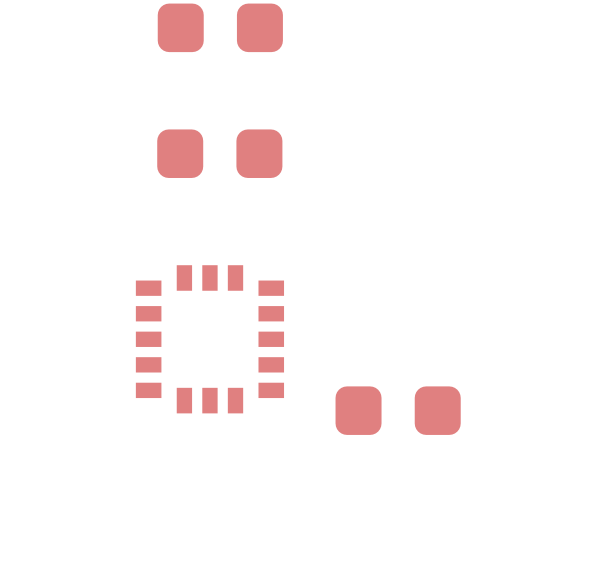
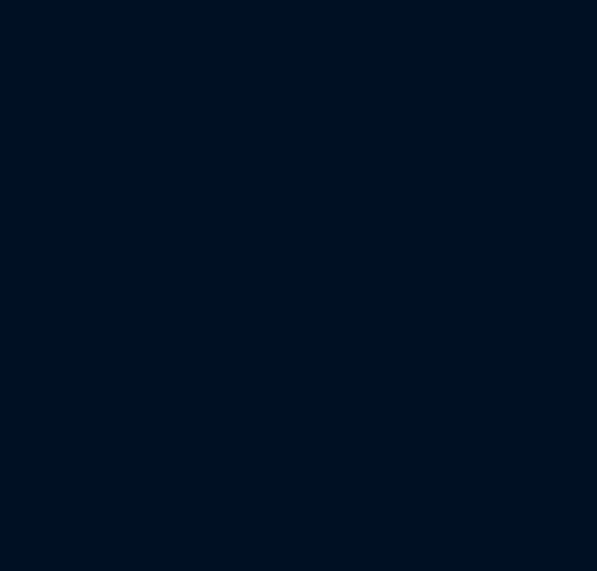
part: (220, 27) -> none
part: (219, 153) -> none
part: (209, 339) -> none
part: (398, 410) -> none

